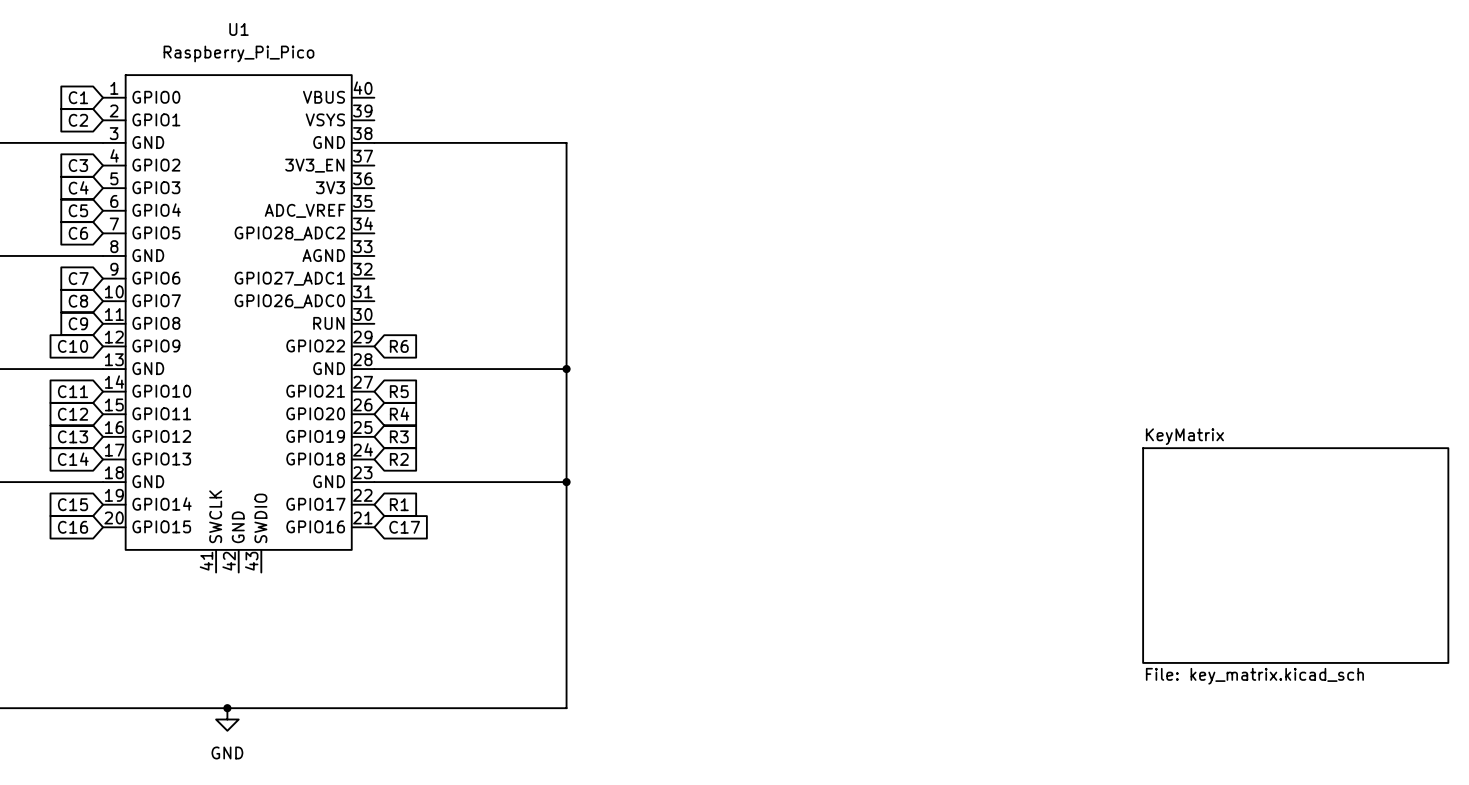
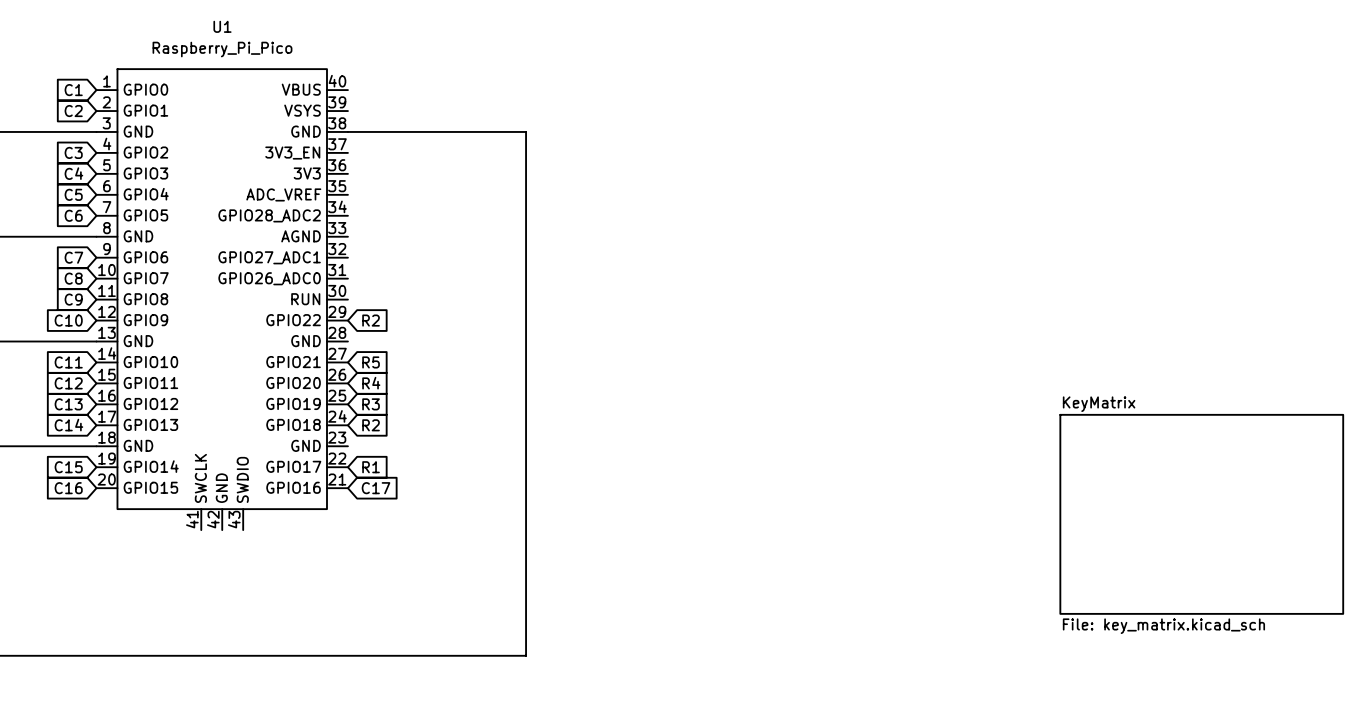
global label: R6 (399, 346) -> R2 (371, 320)
wire: (374, 369) (566, 369) -> none
junction: (566, 369) -> none
wire: (374, 482) (566, 482) -> none
junction: (566, 482) -> none
junction: (227, 708) -> none
power symbol: GND (227, 719) -> none

